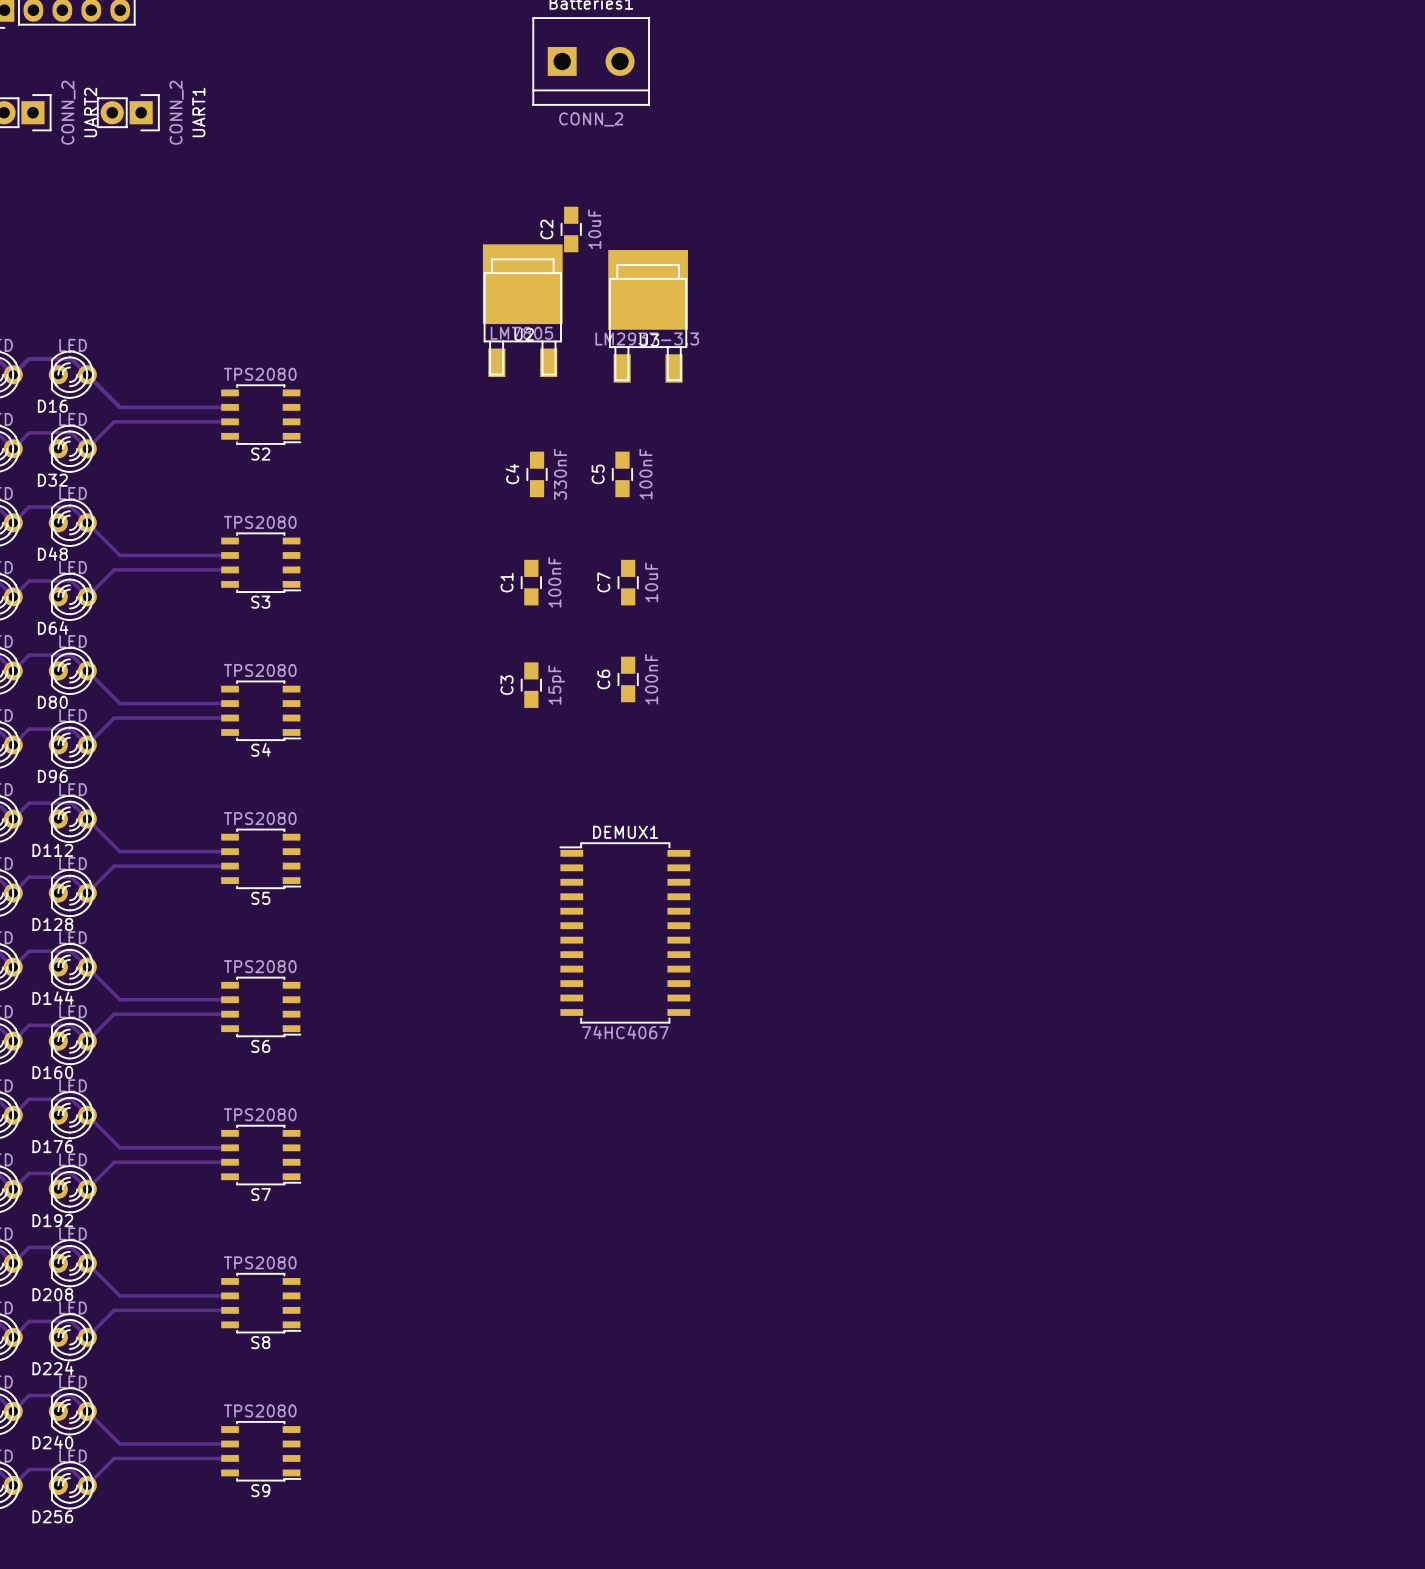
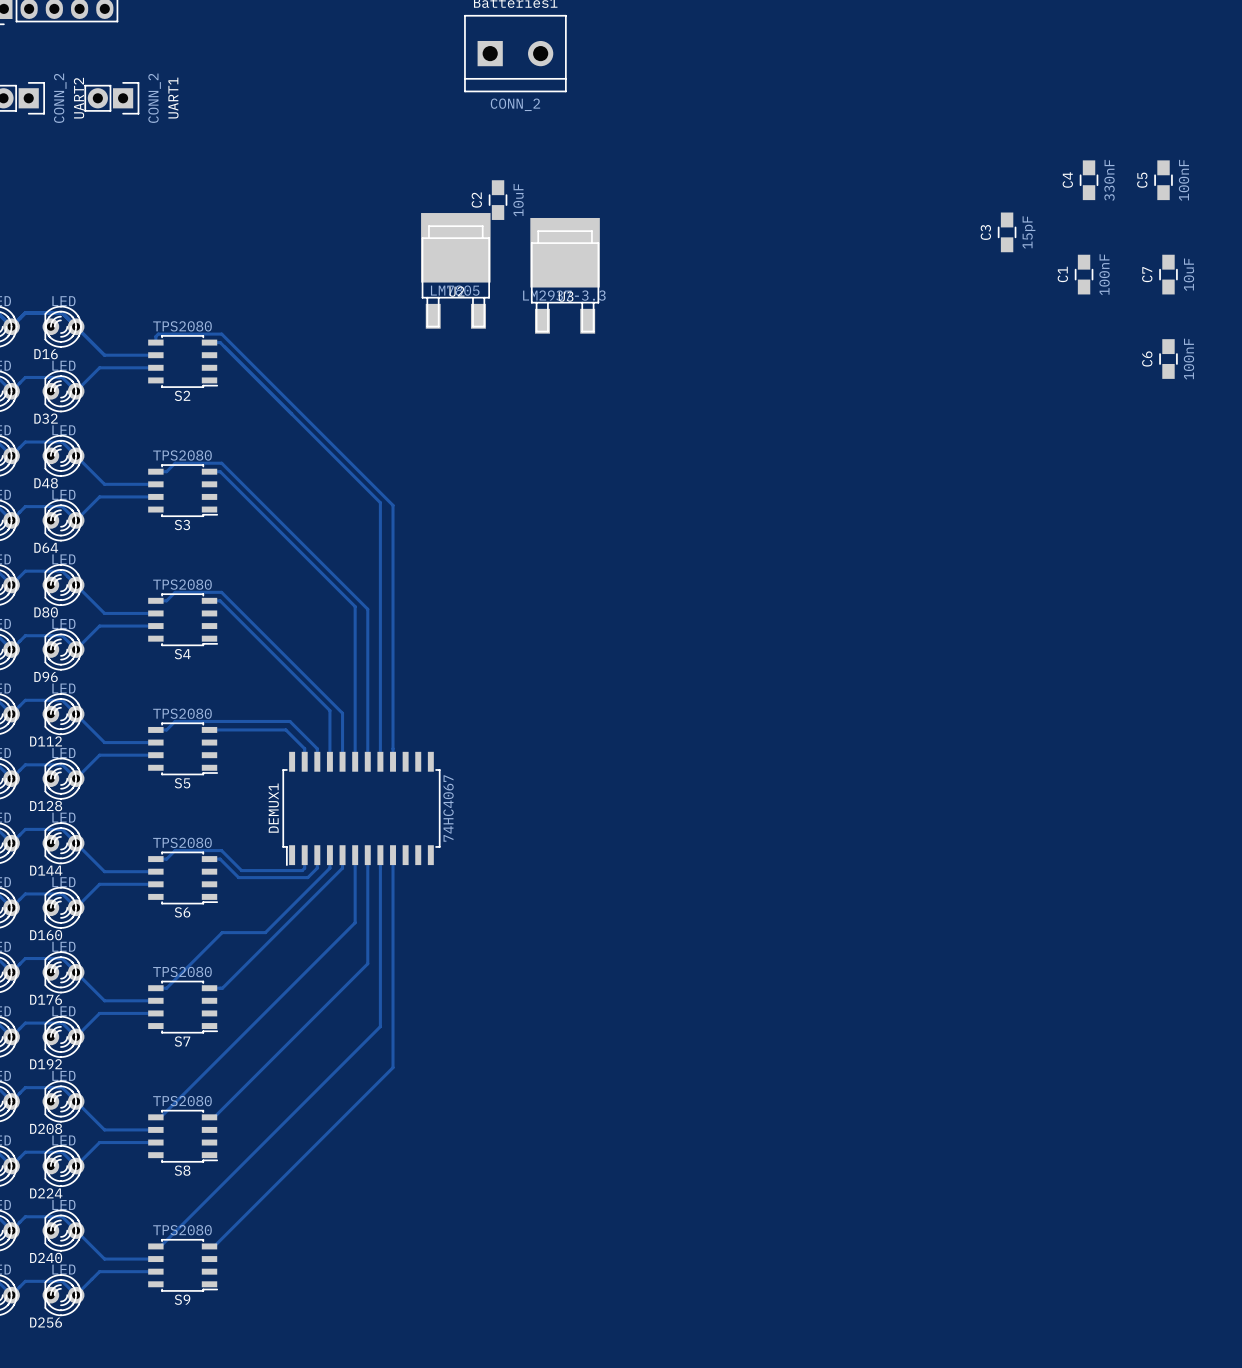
track: none -> (155, 342) (155, 336) (158, 334) (221, 334) (393, 505) (393, 761)
track: none -> (209, 342) (220, 342) (380, 502) (380, 761)
track: (178, 407) (230, 407) -> none
S2 position: (261, 414) -> (183, 361)
track: (178, 421) (230, 421) -> none
C4 position: (537, 474) -> (1089, 180)
C5 position: (622, 474) -> (1163, 180)
track: none -> (155, 471) (166, 471) (175, 463) (221, 463) (367, 609) (367, 761)
track: none -> (209, 471) (220, 471) (355, 606) (355, 761)
track: (179, 555) (230, 555) -> none
S3 position: (261, 562) -> (183, 490)
track: (178, 569) (230, 569) -> none
C1 position: (531, 582) -> (1084, 274)
C7 position: (628, 582) -> (1168, 274)
C6 position: (628, 679) -> (1168, 359)
C3 position: (531, 685) -> (1007, 232)
track: none -> (155, 600) (166, 600) (175, 592) (221, 592) (342, 713) (342, 761)
track: none -> (209, 600) (220, 600) (329, 710) (329, 761)
track: (178, 703) (230, 703) -> none
S4 position: (261, 710) -> (183, 619)
track: (178, 718) (230, 718) -> none
track: none -> (155, 729) (166, 729) (175, 721) (290, 721) (317, 748) (317, 761)
track: none -> (209, 729) (285, 729) (304, 748) (304, 761)
track: (178, 851) (230, 851) -> none
S5 position: (261, 858) -> (183, 748)
track: (178, 866) (230, 866) -> none
DEMUX1 rotation: 0° (624, 932) -> 90° counterclockwise (361, 808)
DEMUX1 position: (624, 932) -> (361, 808)
track: none -> (304, 855) (304, 868) (302, 870) (241, 870) (221, 850) (175, 850) (166, 859) (155, 859)
track: none -> (317, 855) (317, 868) (307, 877) (238, 877) (220, 859) (209, 859)
track: none -> (329, 855) (329, 868) (265, 932) (222, 932) (166, 988) (155, 988)
track: none -> (342, 855) (342, 868) (222, 988) (209, 988)
track: none -> (355, 855) (355, 922) (160, 1117) (155, 1117)
track: none -> (367, 855) (367, 963) (214, 1117) (209, 1117)
track: none -> (380, 855) (380, 1026) (160, 1246) (155, 1246)
track: none -> (393, 855) (393, 1067) (214, 1246) (209, 1246)
track: (178, 999) (230, 999) -> none
S6 position: (261, 1006) -> (183, 877)
track: (178, 1014) (230, 1014) -> none
track: (178, 1147) (230, 1147) -> none
S7 position: (261, 1155) -> (183, 1007)
track: (178, 1162) (230, 1162) -> none
track: (178, 1295) (230, 1295) -> none
S8 position: (261, 1303) -> (183, 1136)
track: (178, 1310) (230, 1310) -> none
track: (178, 1444) (230, 1444) -> none
S9 position: (261, 1451) -> (183, 1265)
track: (178, 1458) (230, 1458) -> none

